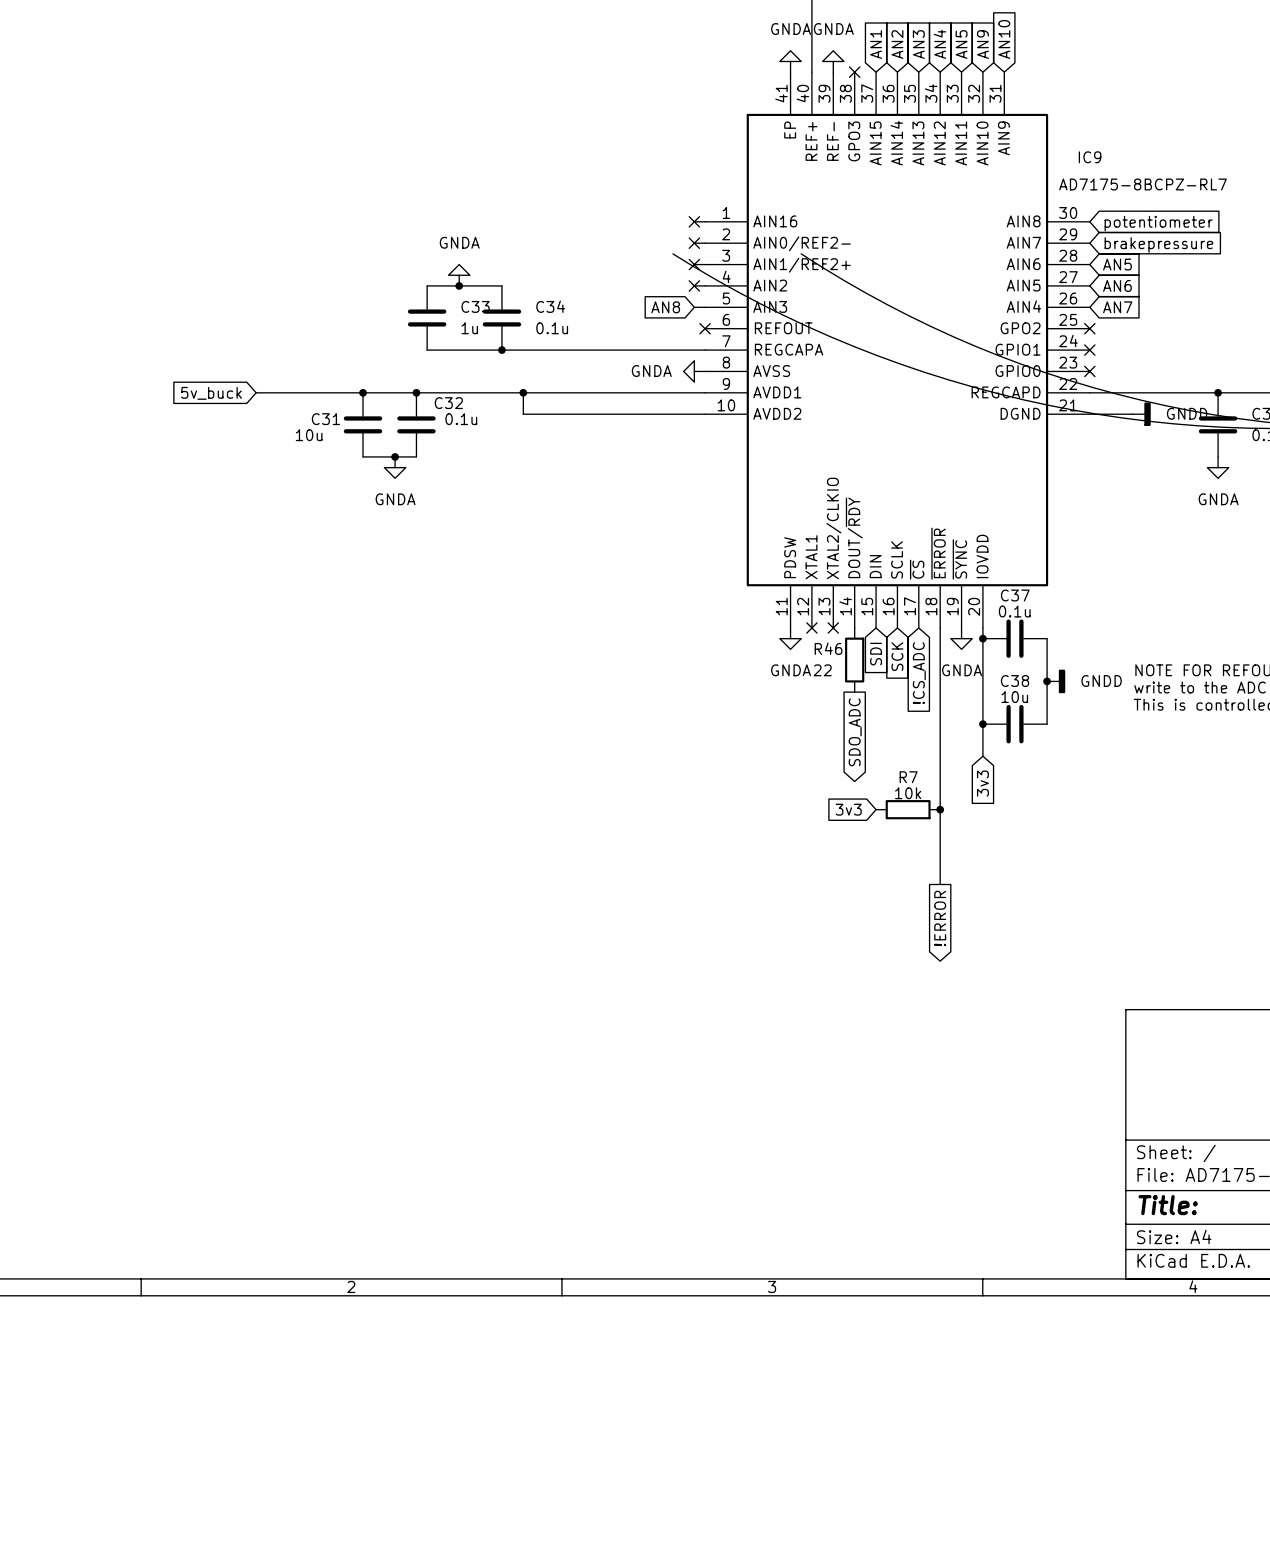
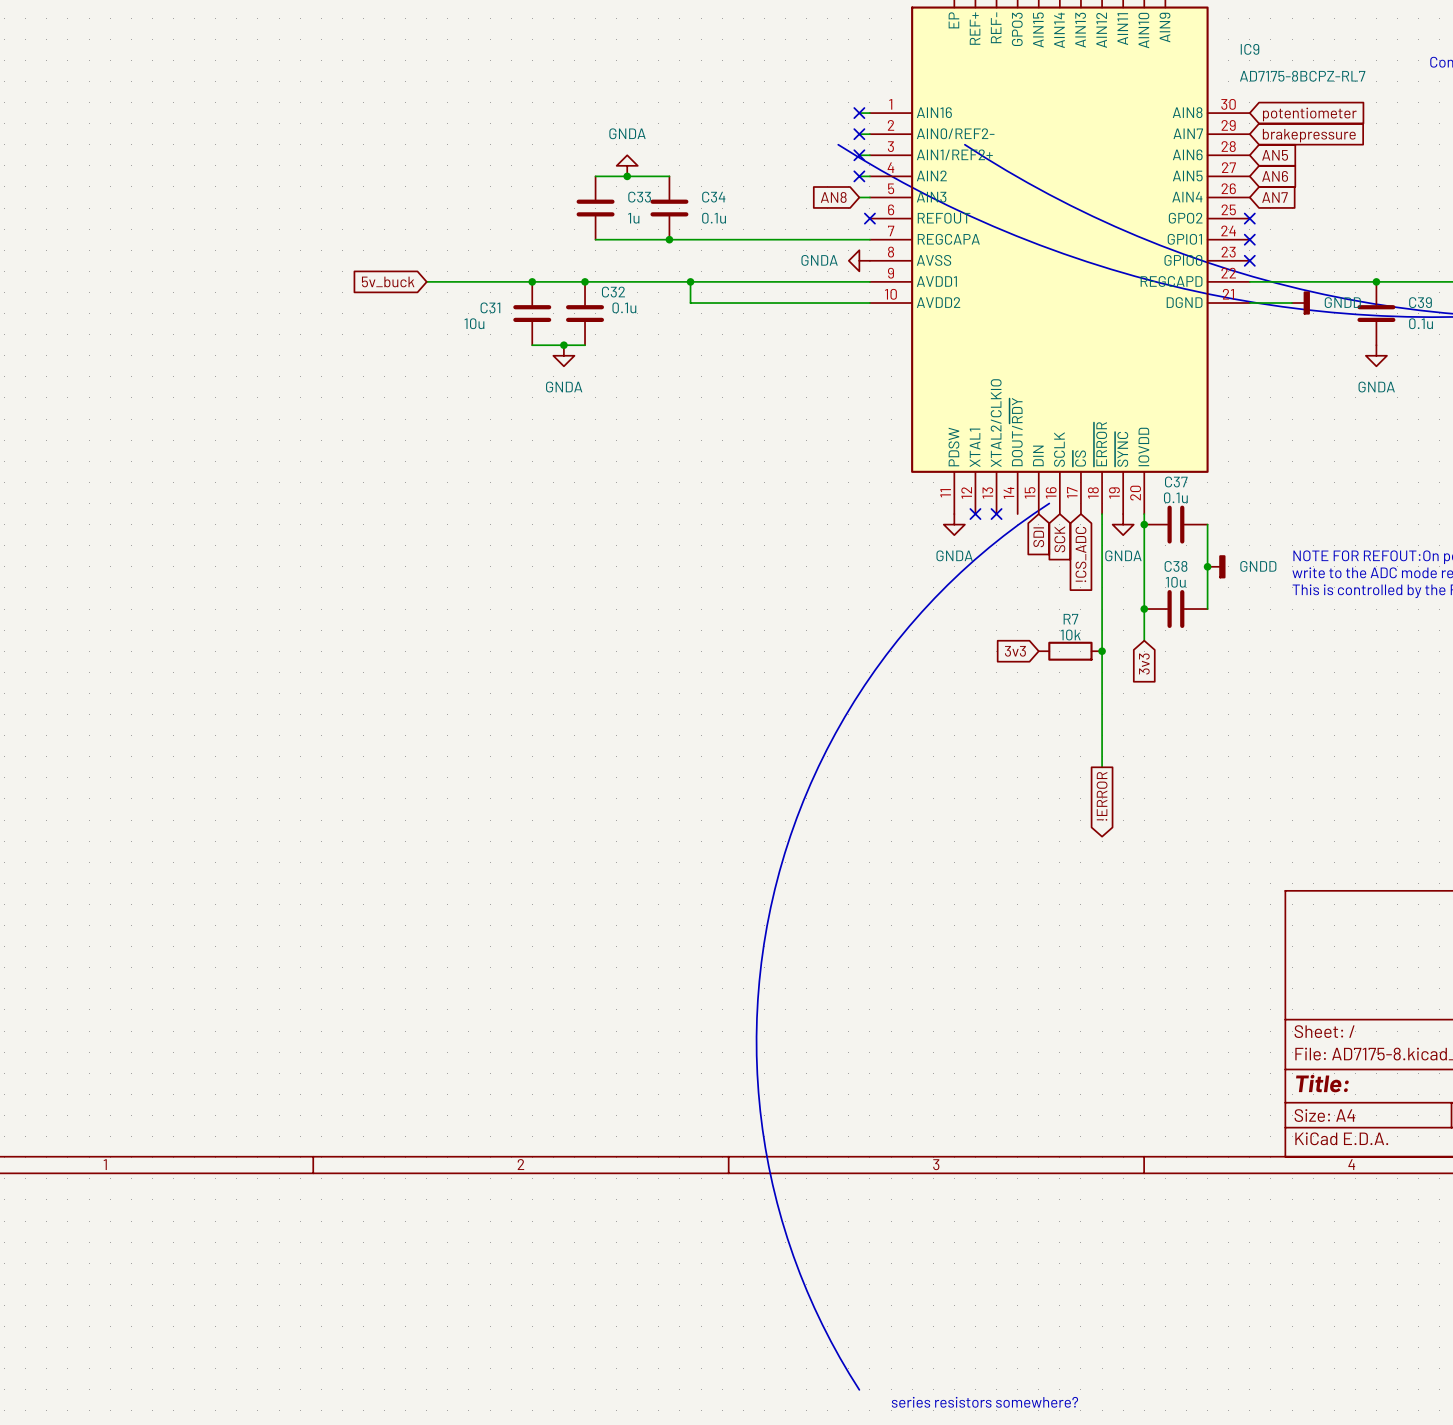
line: none -> (1049, 503) (1003, 535) (961, 572) (921, 611) (875, 670) (835, 733) (810, 783) (790, 835) (770, 907) (759, 981) (756, 1036) (758, 1092) (765, 1148) (782, 1220) (800, 1273) (831, 1341) (859, 1389)
R46: 22 (854, 660) -> none
global label: SDO_ADC (855, 732) -> none
global label position: 3v3 (848, 809) -> 3v3 (1015, 651)
R7 position: (908, 809) -> (1070, 651)
junction position: (940, 809) -> (1102, 651)
text: none -> series resistors somewhere? (984, 1402)

